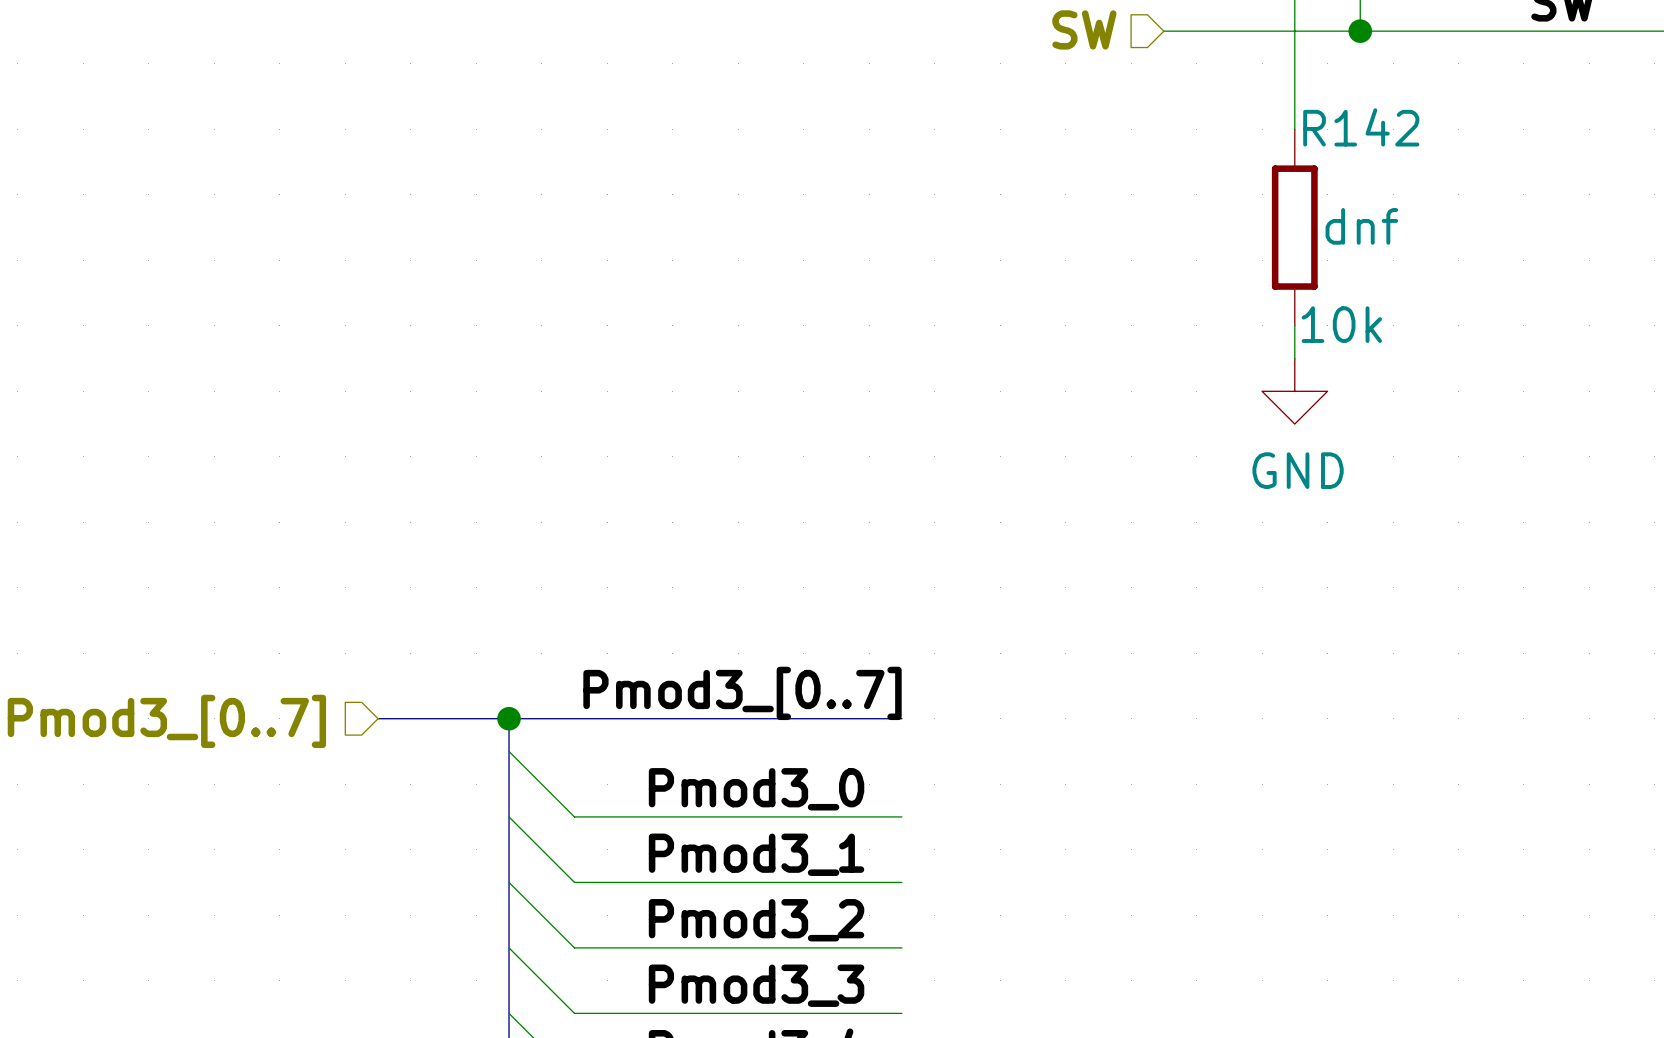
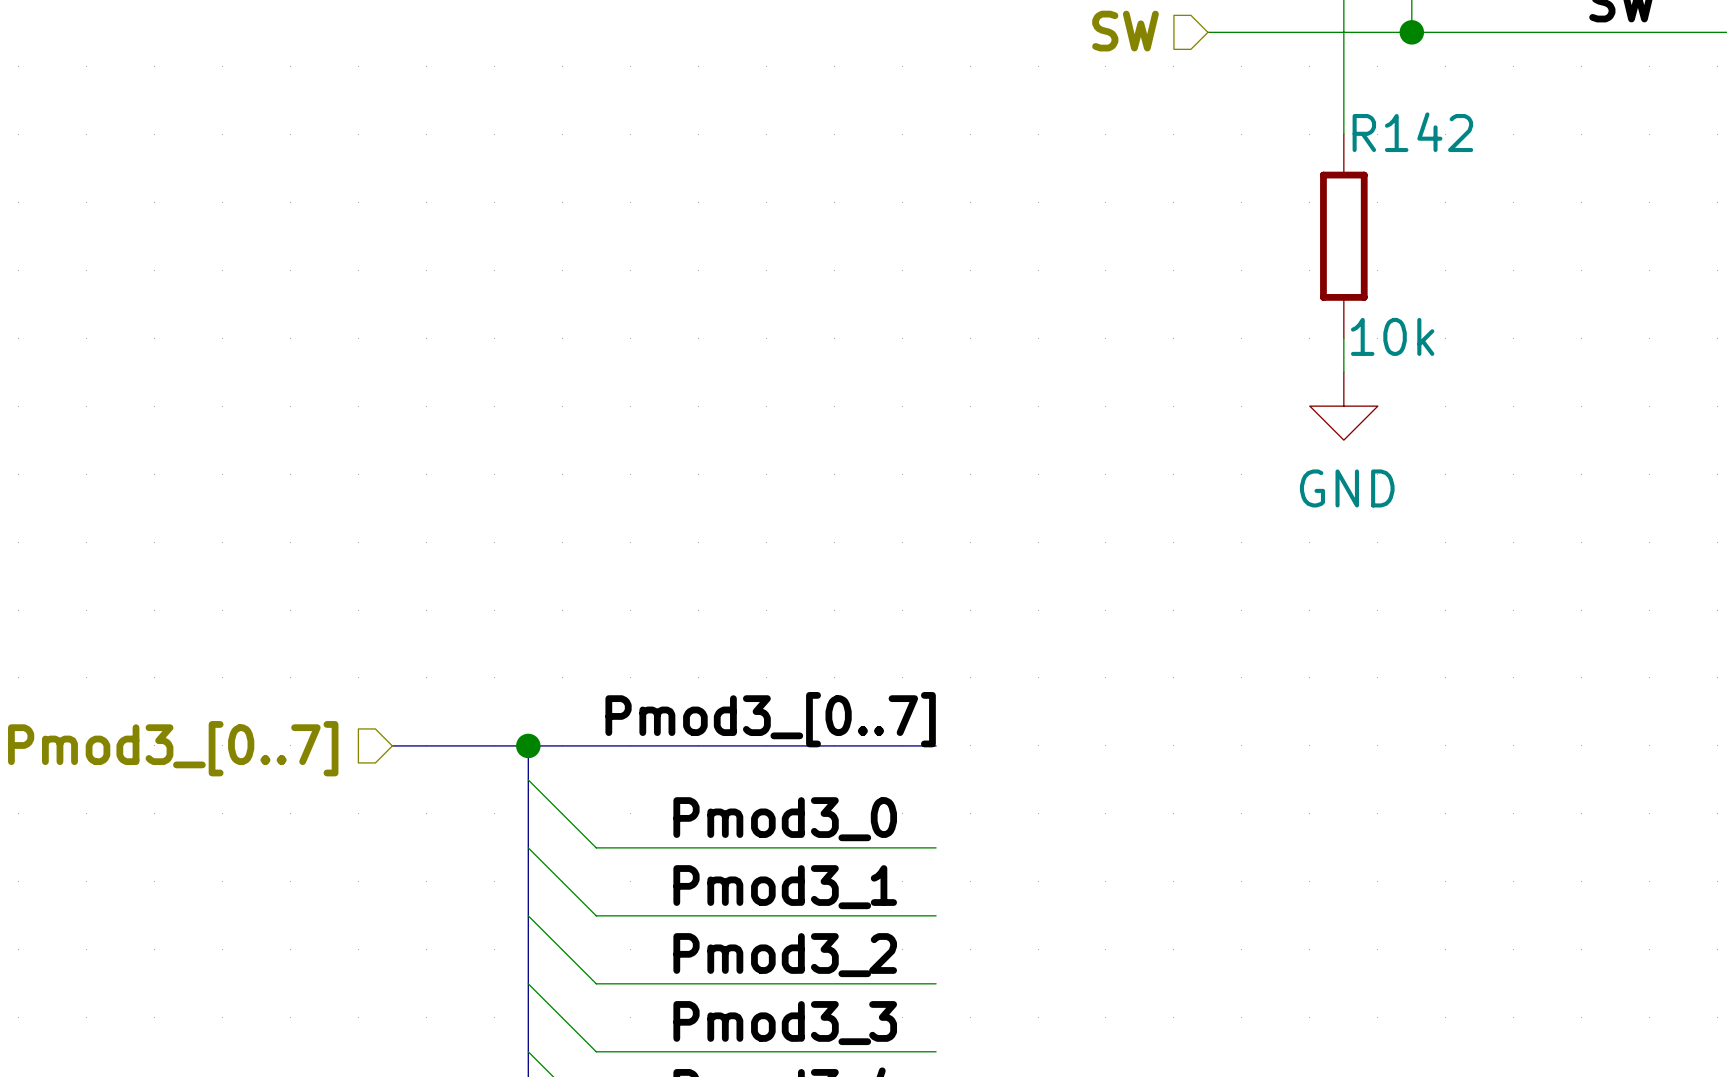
R142 text: dnf (1361, 226) -> none

